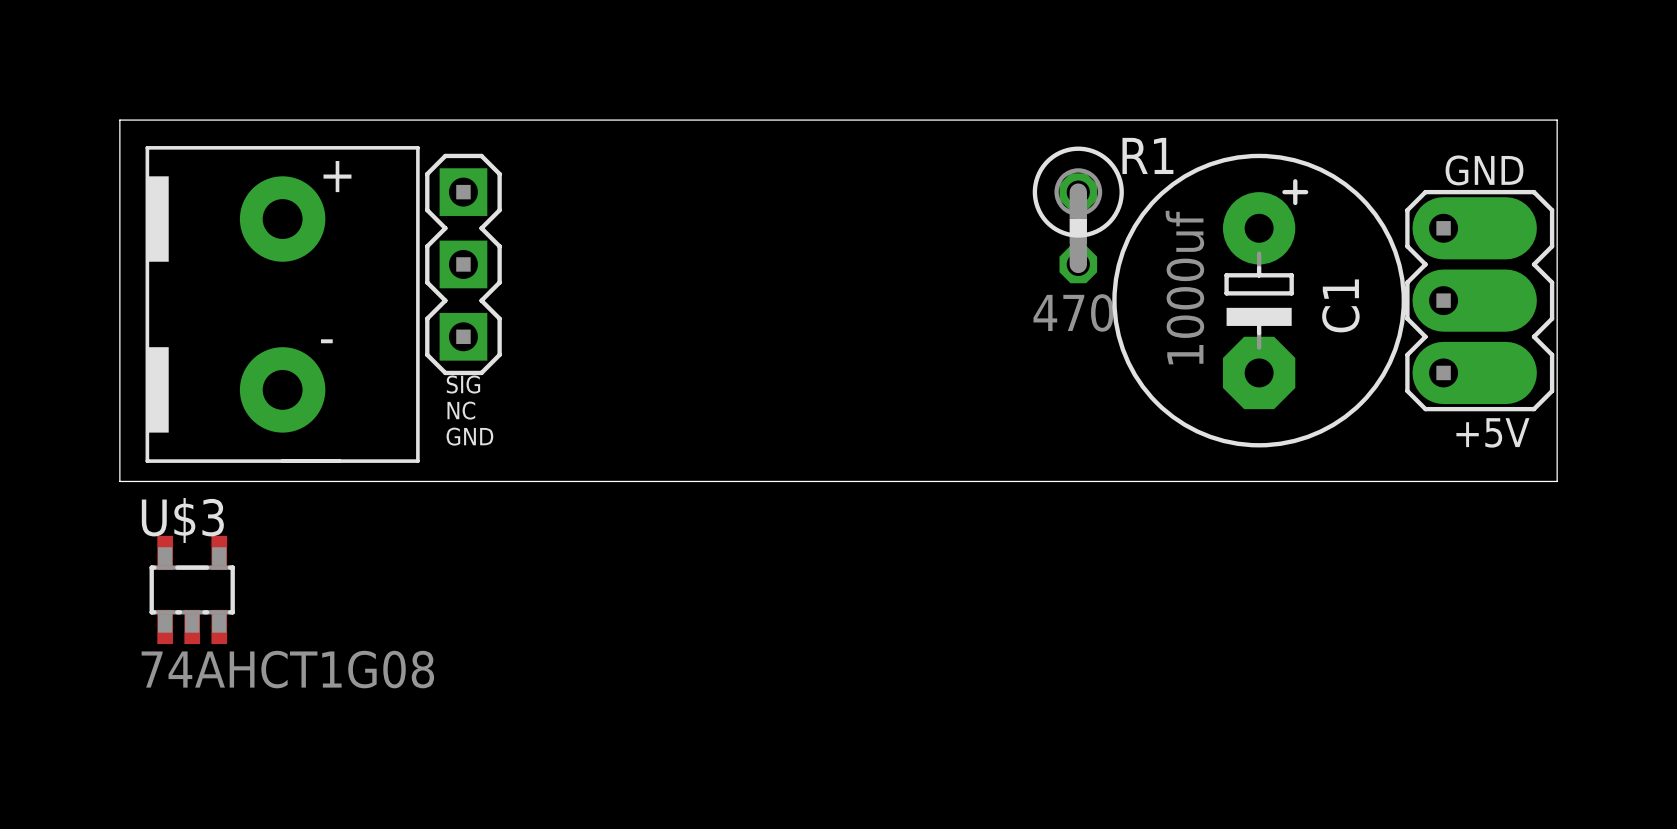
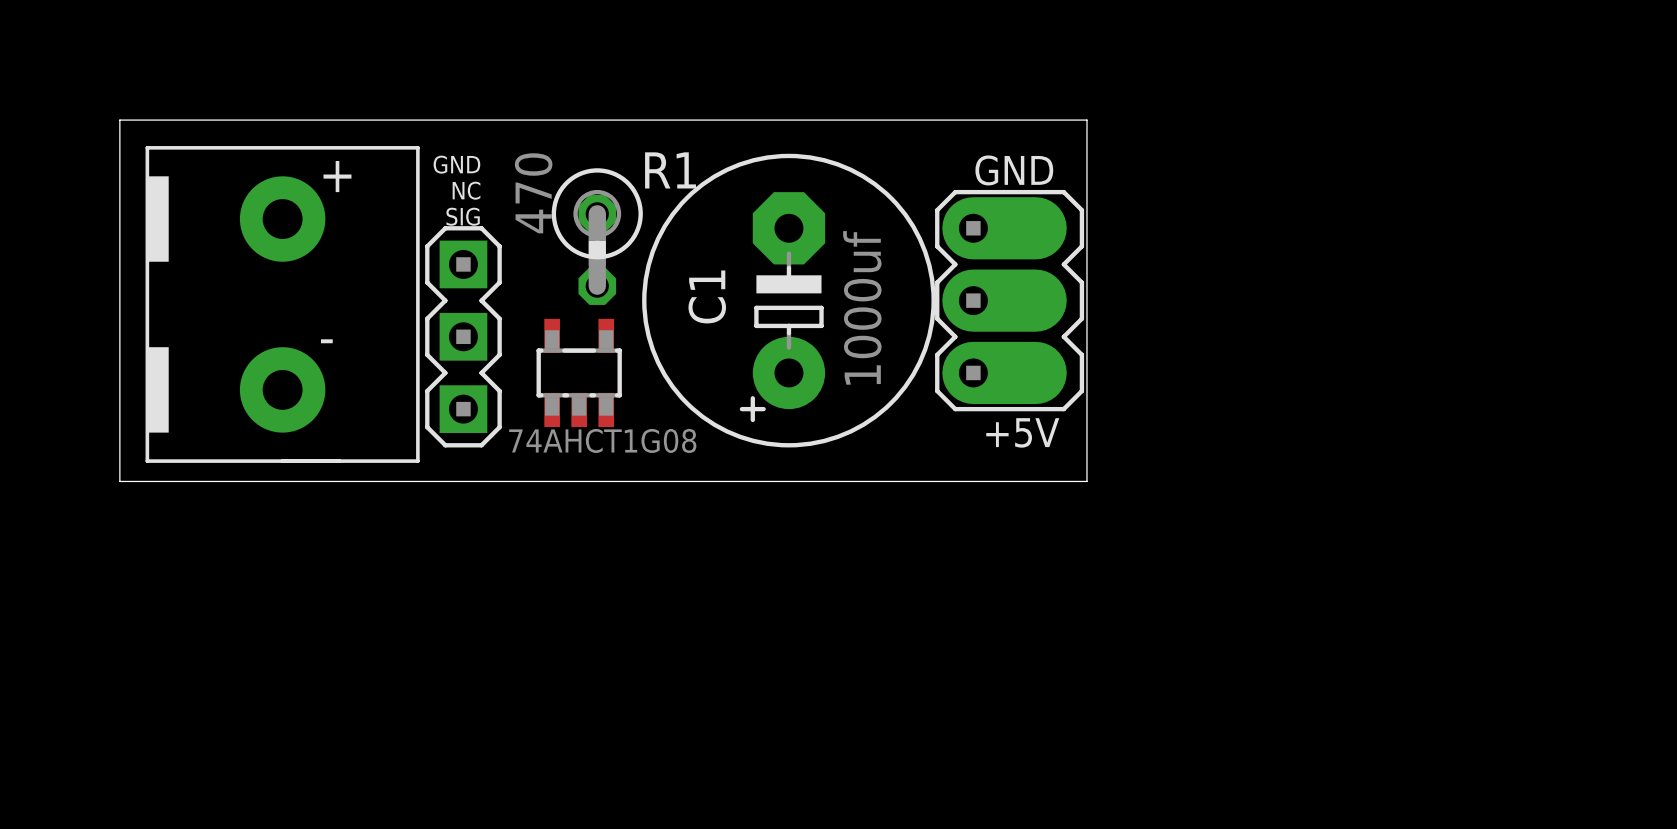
board edge: (1086, 120) (1557, 120) (1557, 481) (1086, 481) -> (1086, 120) (1086, 481)
R1 name position: R1 (1147, 155) -> R1 (670, 170)
R1 position: (1078, 214) -> (597, 236)
part position: (463, 264) -> (463, 336)
C1 rotation: 0° (1259, 300) -> 180° (788, 300)
C1 position: (1259, 300) -> (788, 300)
part position: (1479, 300) -> (1009, 300)
R1 value rotation: 0° (1073, 312) -> 90° counterclockwise (533, 193)
R1 value position: 470 (1073, 312) -> 470 (533, 193)
part: none -> 74AHCT1G08 (579, 372)
text position: SIG (463, 384) -> SIG (463, 216)
text position: NC (461, 410) -> NC (466, 190)
text position: GND (469, 436) -> GND (456, 164)
U$3: 74AHCT1G08 (192, 589) -> none

